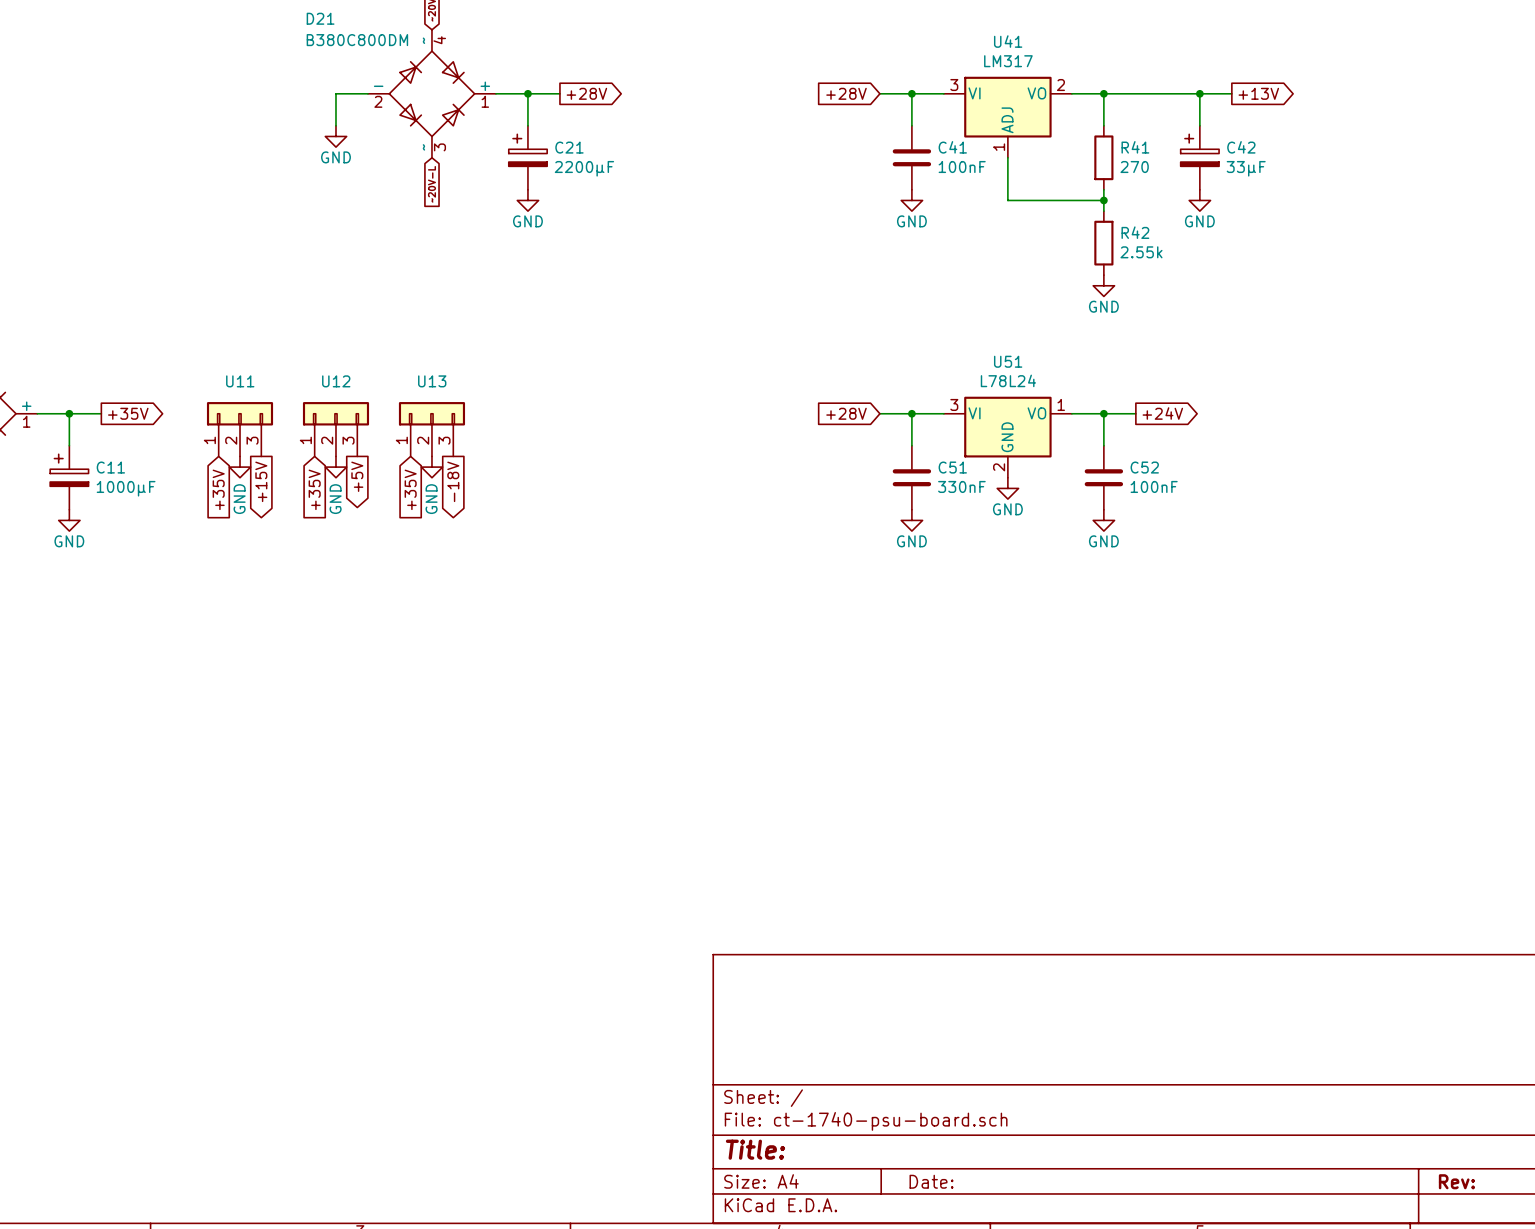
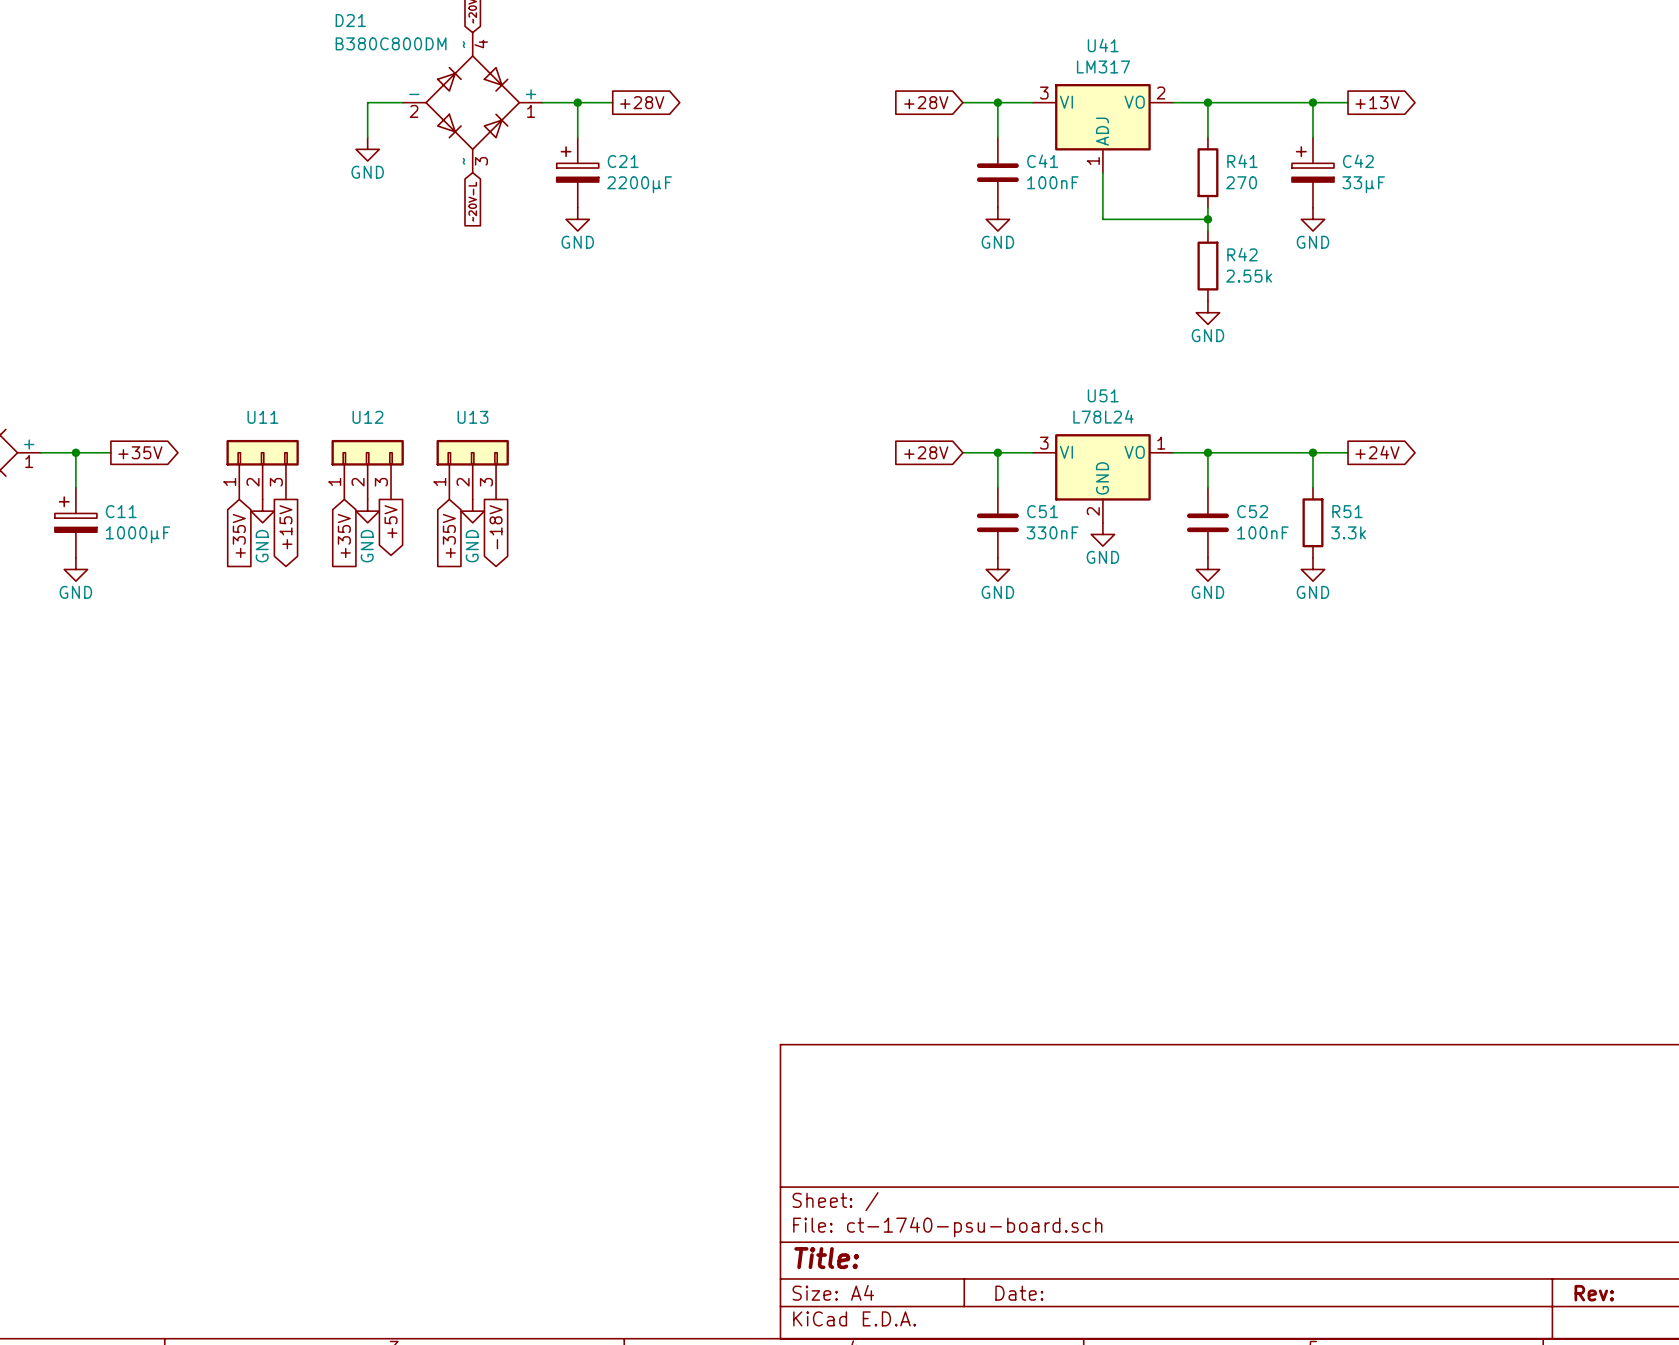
wire: none -> (1242, 452) (1348, 452)
global label position: +24V (1162, 413) -> +24V (1377, 452)
wire: none -> (1312, 452) (1312, 487)
junction: none -> (1312, 452)
R51: none -> 3.3k (1312, 522)
power symbol: none -> GND (1312, 569)

